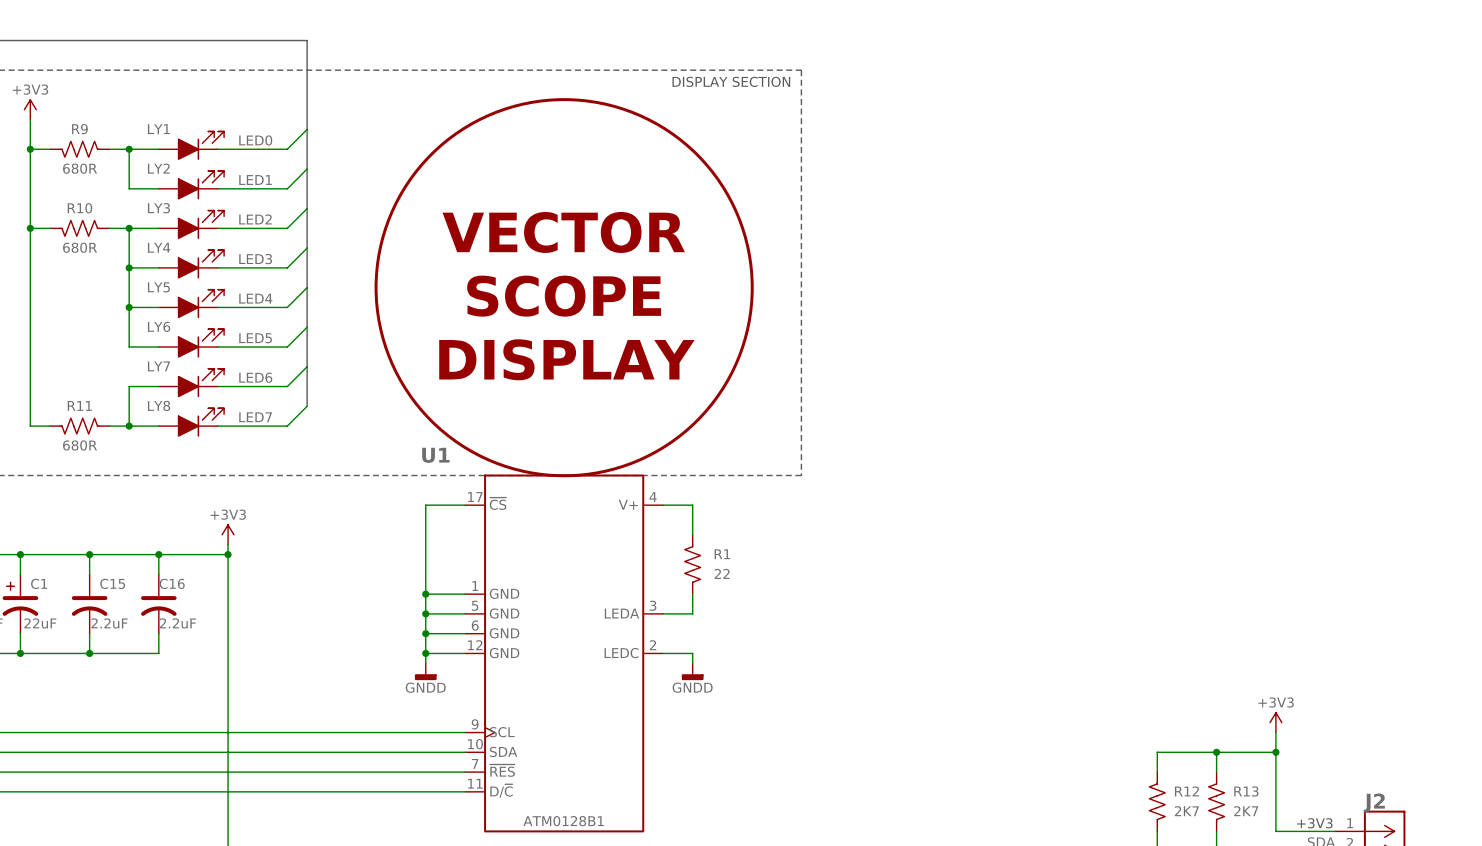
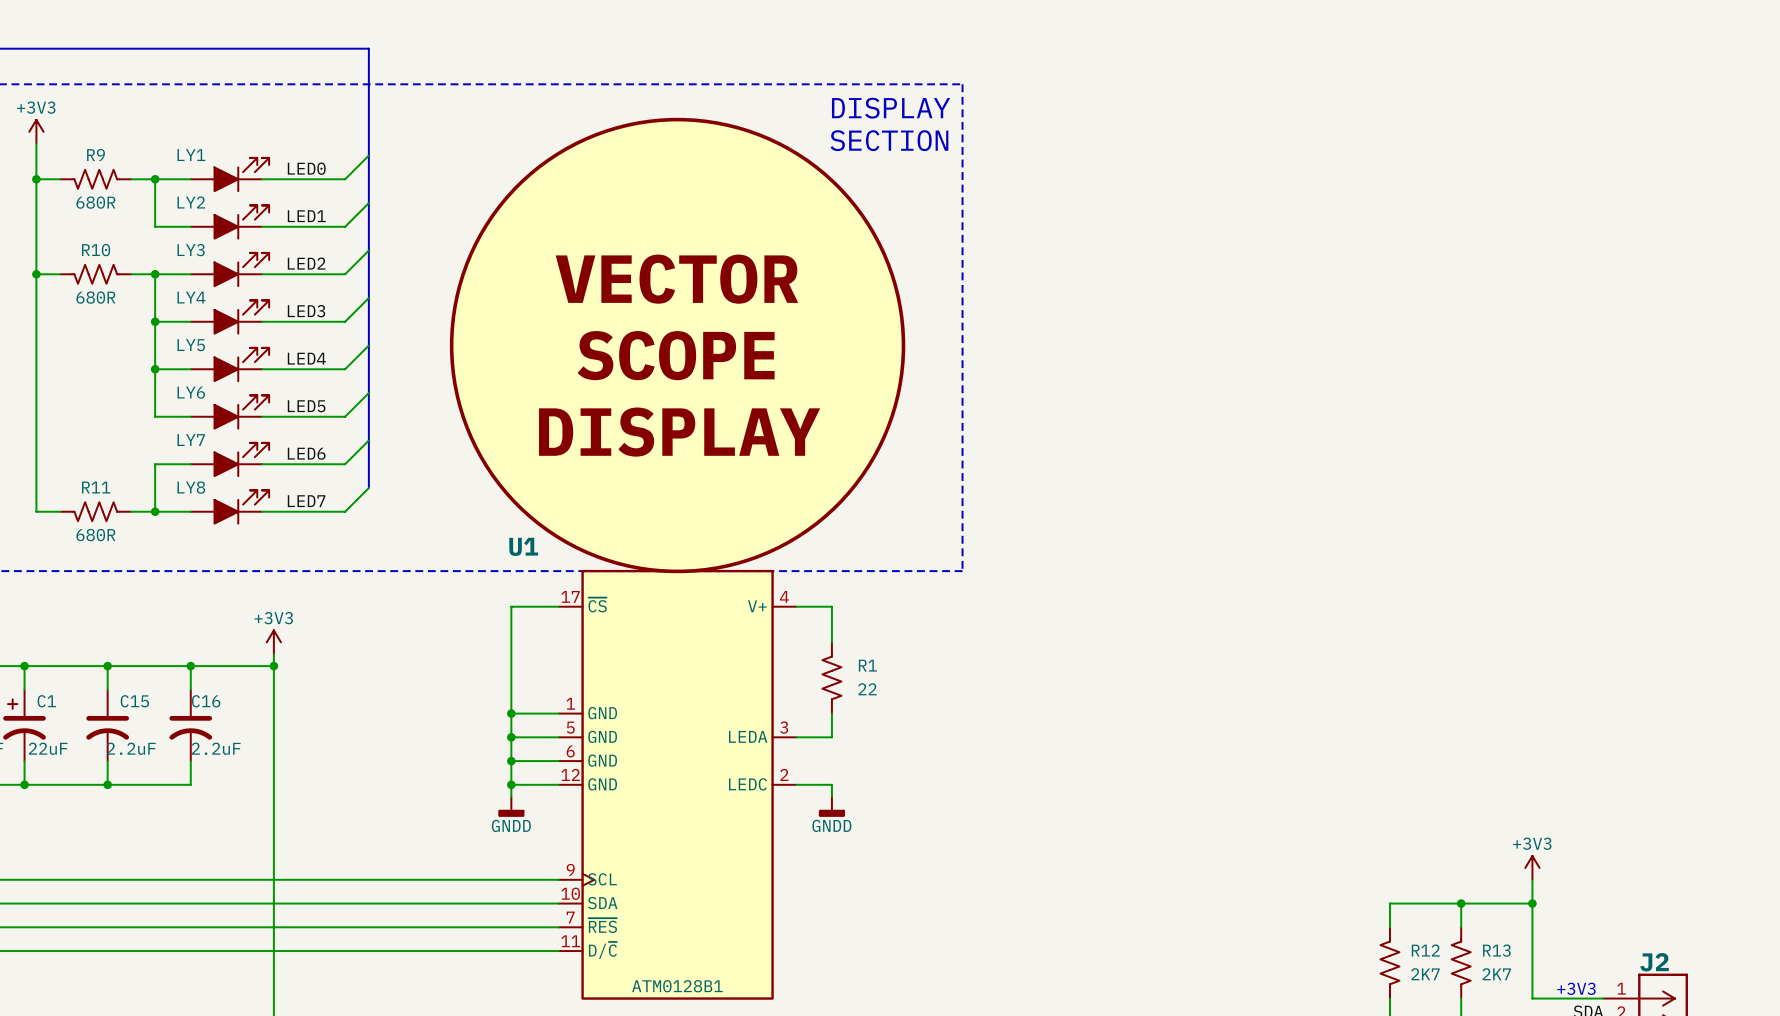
text: DISPLAY SECTION (731, 81) -> DISPLAY (891, 108)
text: none -> SECTION (889, 140)

